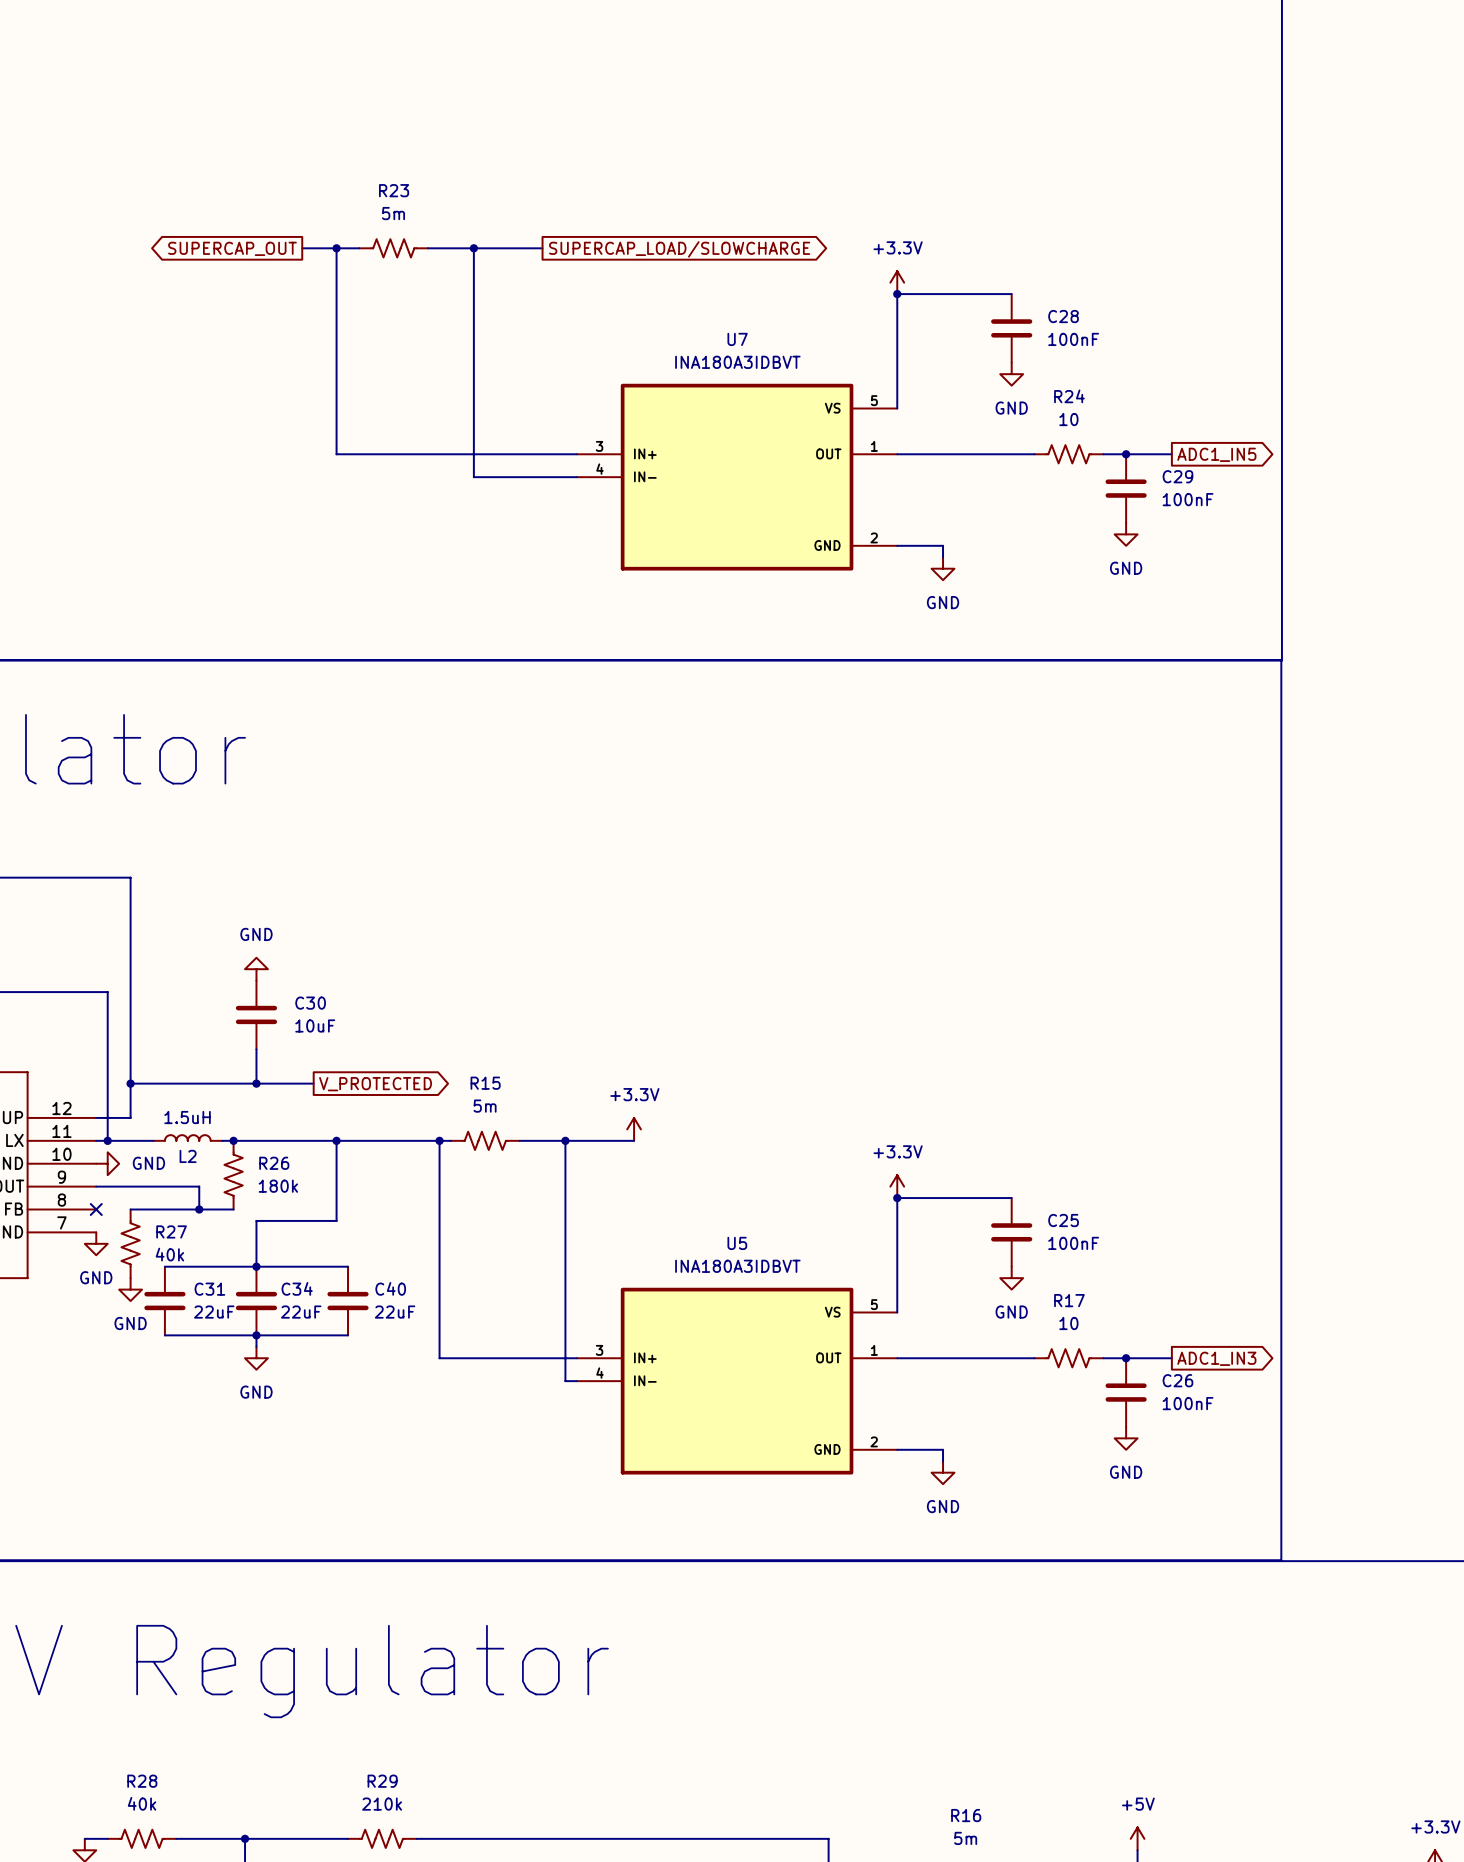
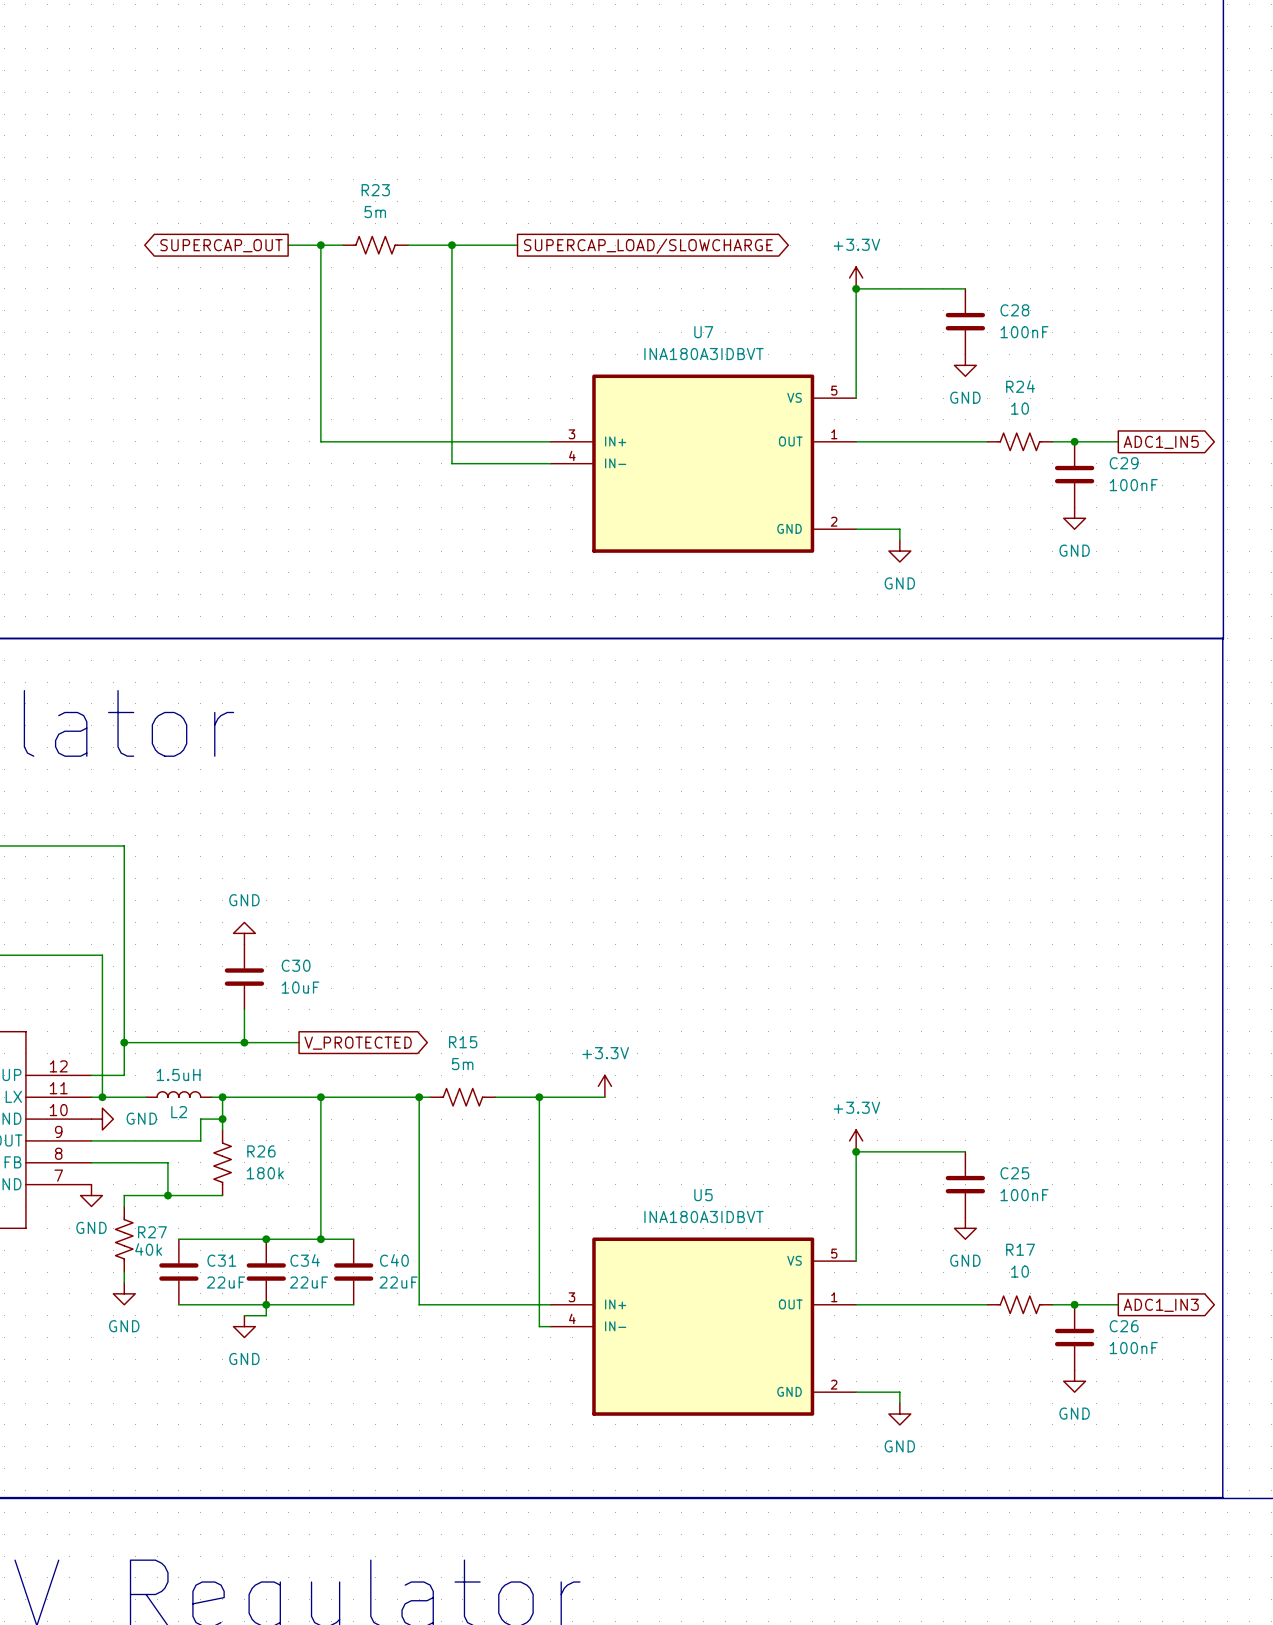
junction: none -> (222, 1119)
R26 position: (233, 1175) -> (222, 1162)
wire: (199, 1186) (199, 1209) -> (189, 1140) (200, 1140) (200, 1119) (222, 1119)
wire: none -> (91, 1162) (124, 1162)
no-connect mark: (96, 1209) -> none
wire: (176, 1209) (233, 1209) -> (167, 1162) (167, 1195)
junction: (199, 1209) -> none
wire: (336, 1220) (256, 1220) (256, 1266) -> (320, 1173) (320, 1239)
R27 name position: R27 (171, 1231) -> R27 (152, 1232)
R27 position: (130, 1243) -> (124, 1239)
junction: none -> (167, 1195)
wire: none -> (222, 1195) (124, 1195) (124, 1206)
R27 value position: 40k (169, 1254) -> 40k (148, 1249)
wire: (164, 1266) (348, 1266) -> (178, 1239) (353, 1239)
junction: (256, 1266) -> none
power symbol position: GND (130, 1289) -> GND (124, 1293)
junction: none -> (266, 1239)
junction: none -> (320, 1239)
C31 position: (164, 1301) -> (178, 1272)
C34 position: (256, 1301) -> (266, 1272)
C40 position: (348, 1301) -> (353, 1272)
wire: (164, 1335) (348, 1335) -> (178, 1304) (353, 1304)
wire: (256, 1335) (256, 1346) -> (124, 1272) (124, 1282)
junction: (256, 1335) -> none
power symbol position: GND (256, 1358) -> GND (244, 1326)
wire: none -> (266, 1304) (266, 1315) (244, 1315)
junction: none -> (266, 1304)

